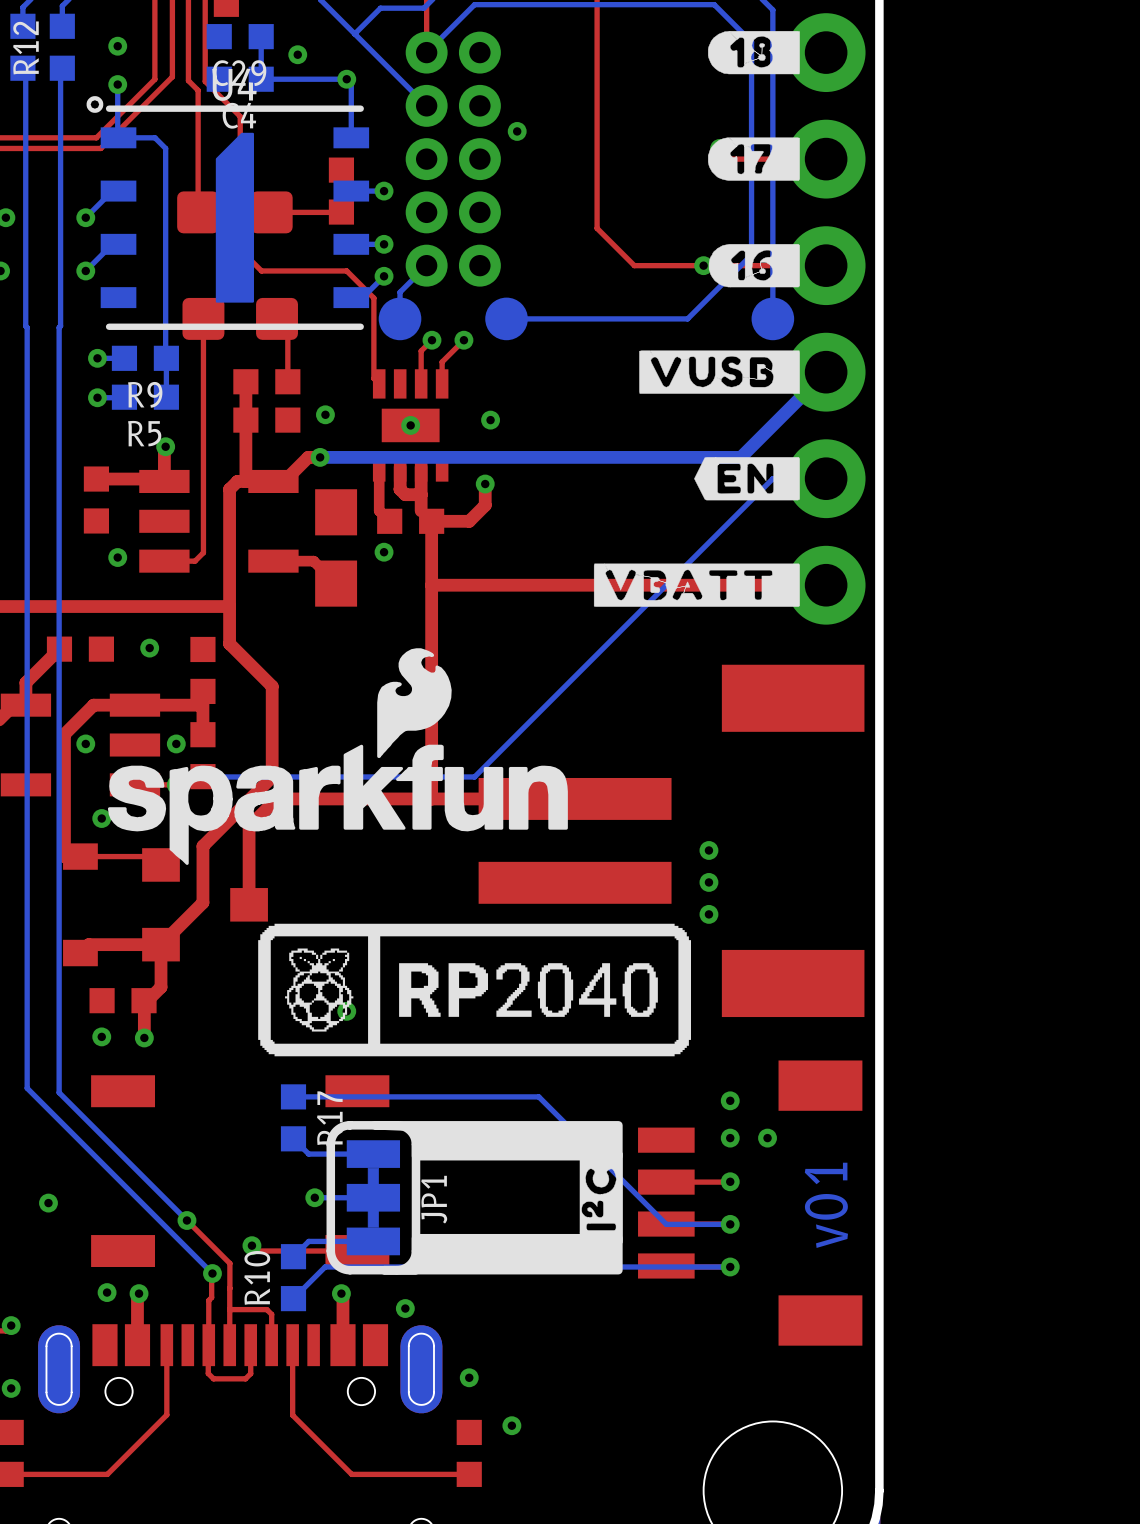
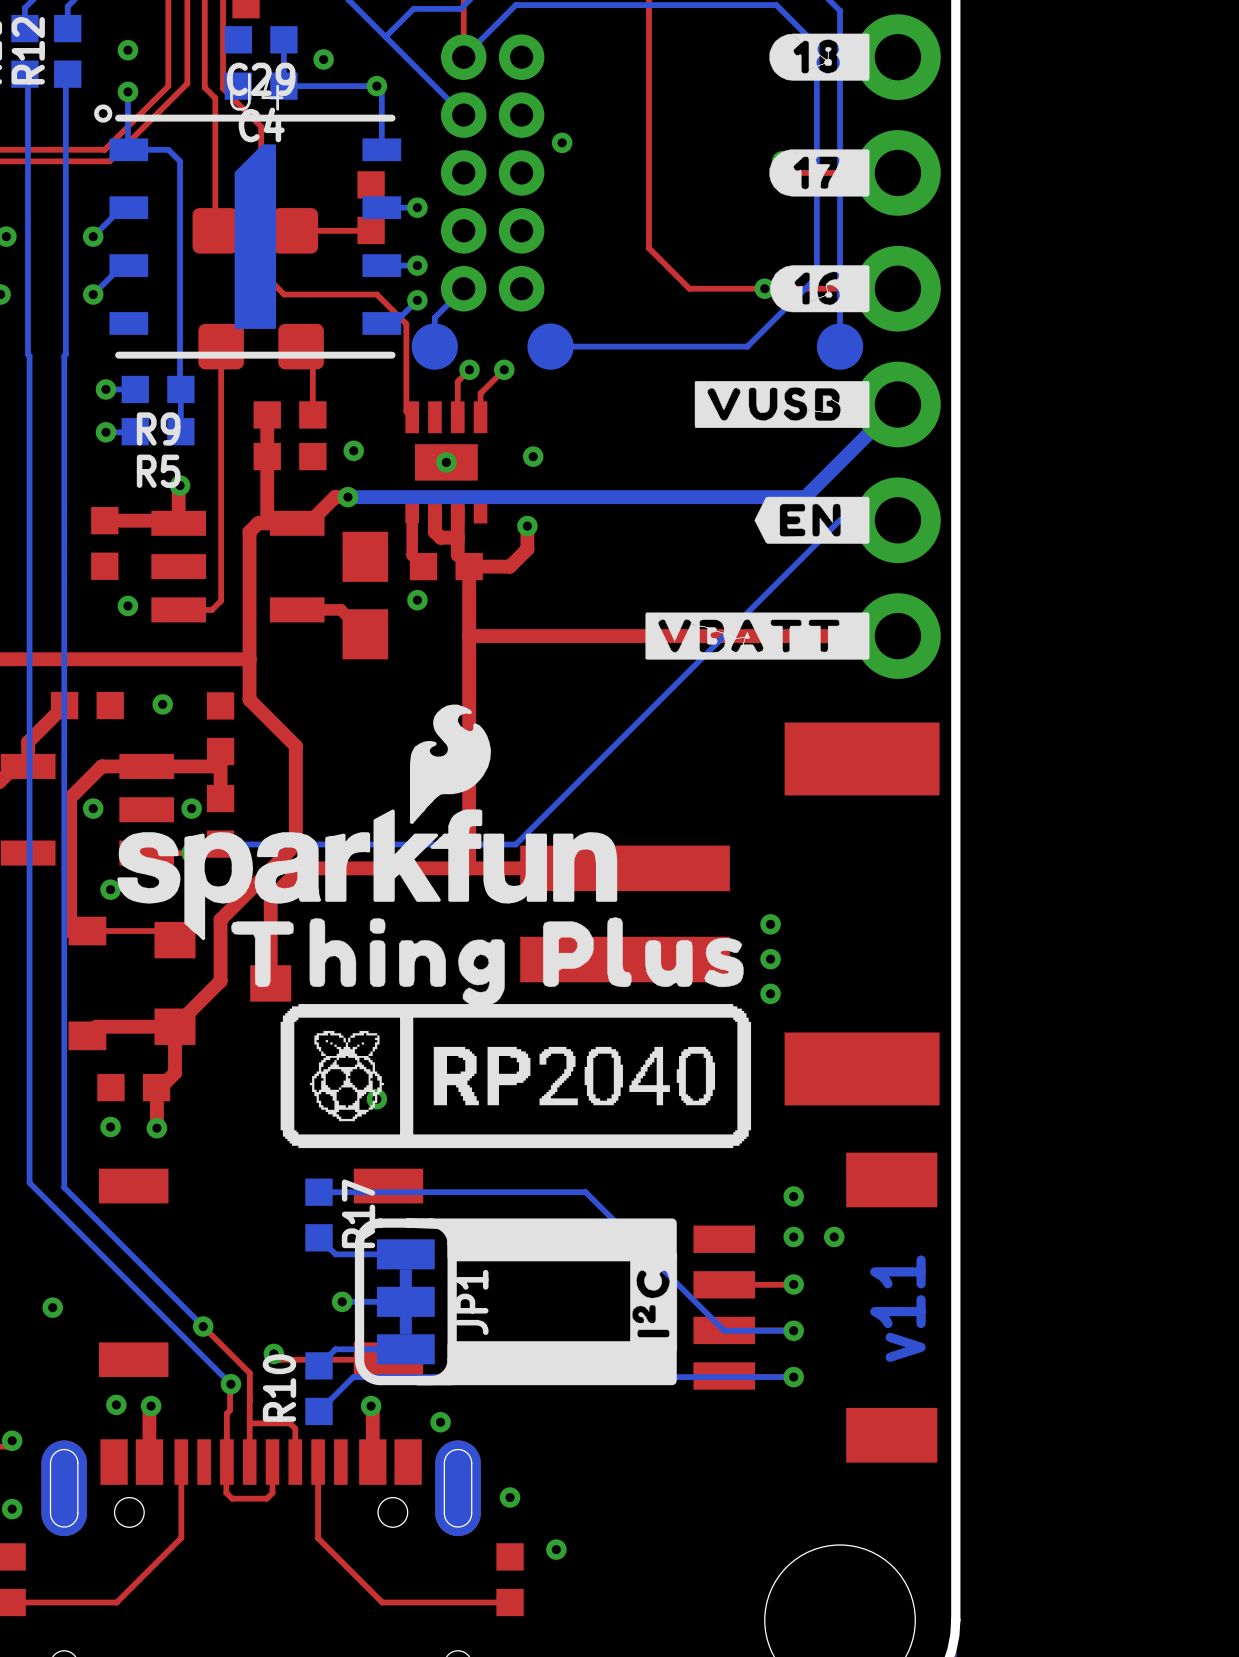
drawing: none -> [231, 917, 744, 1008]
text: v01 (826, 1205) -> v11 (897, 1308)

